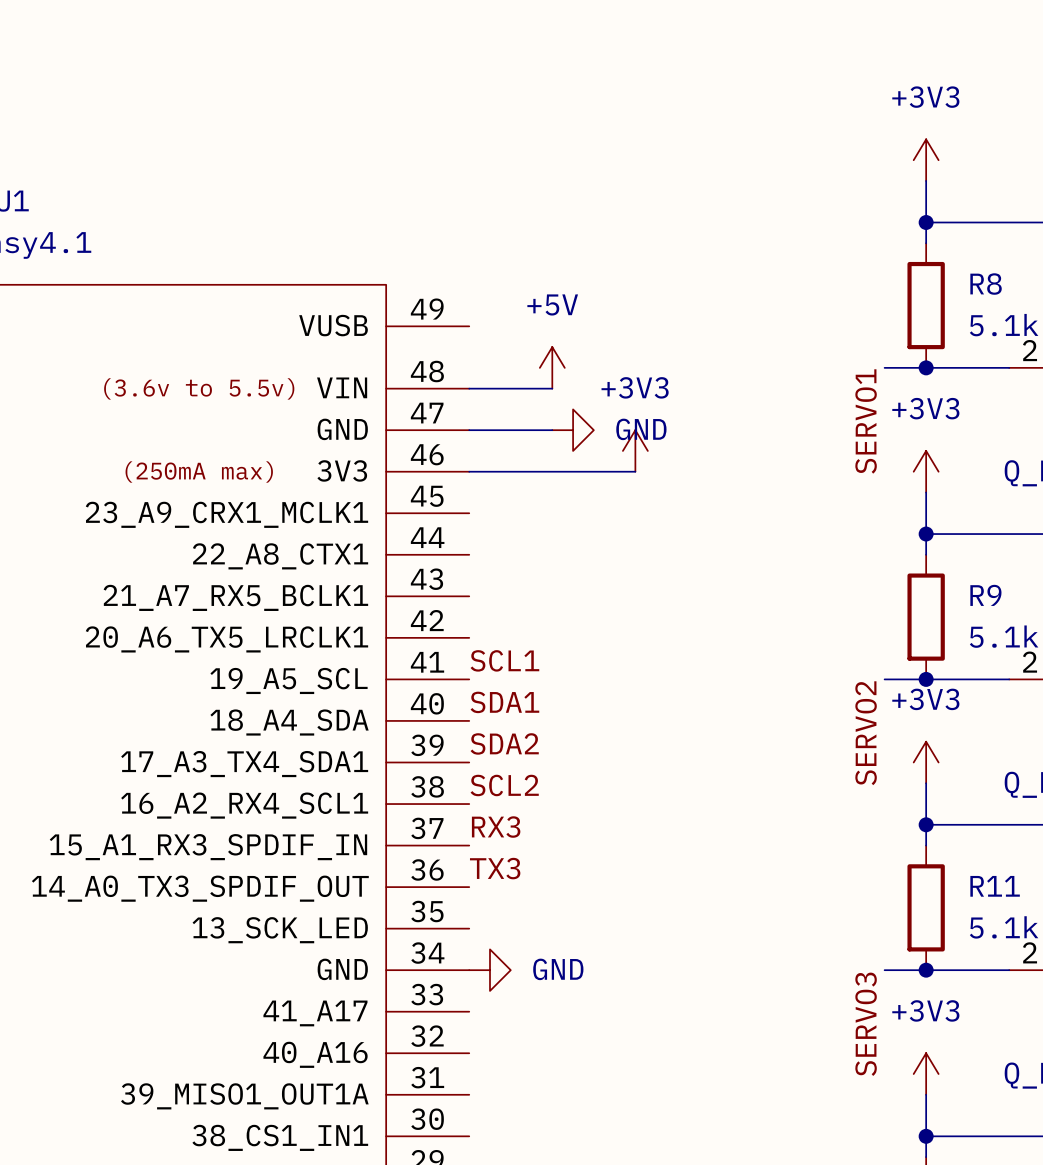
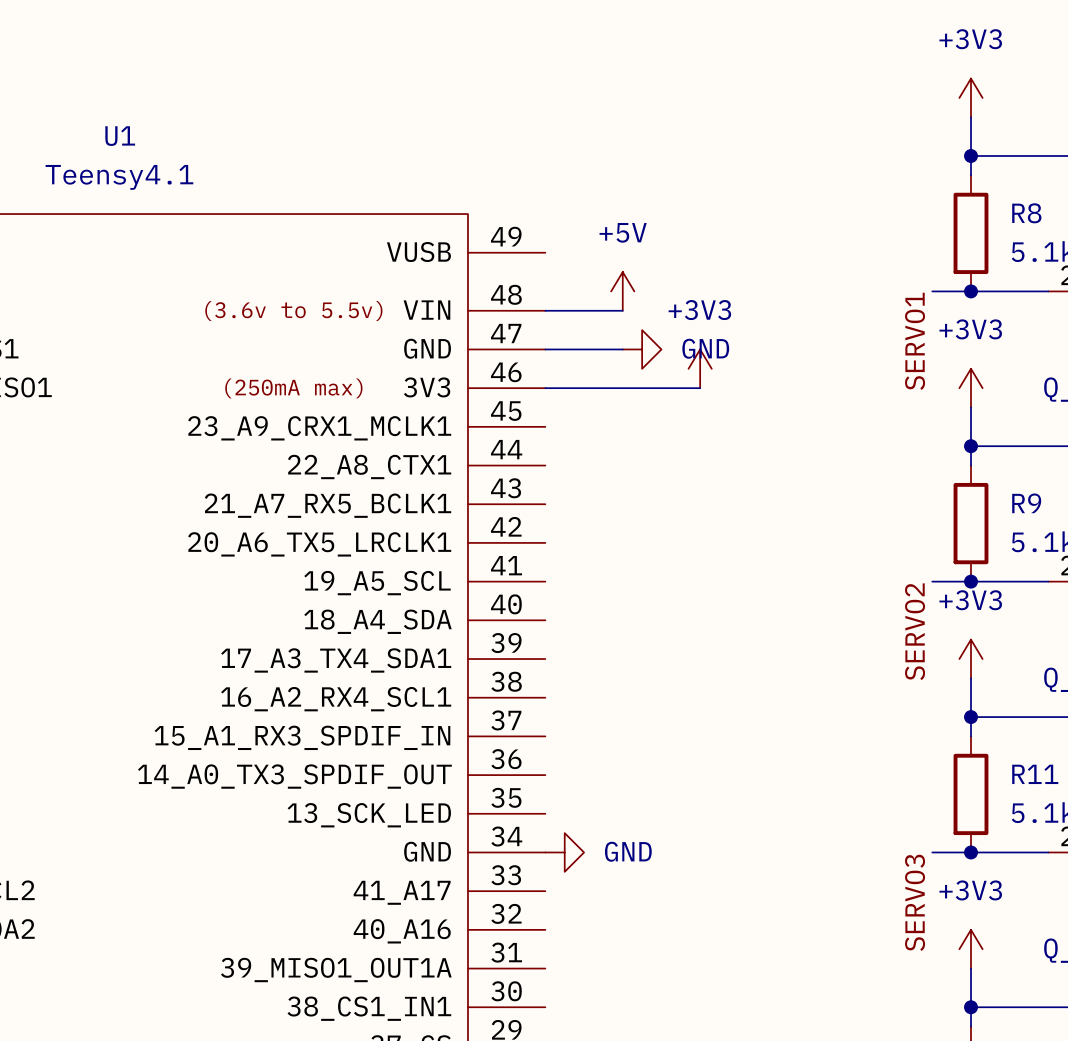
label: SCL1 (504, 660) -> none
label: SDA1 (504, 702) -> none
label: SDA2 (504, 743) -> none
label: SCL2 (504, 785) -> none
label: RX3 (496, 827) -> none
label: TX3 (495, 868) -> none

